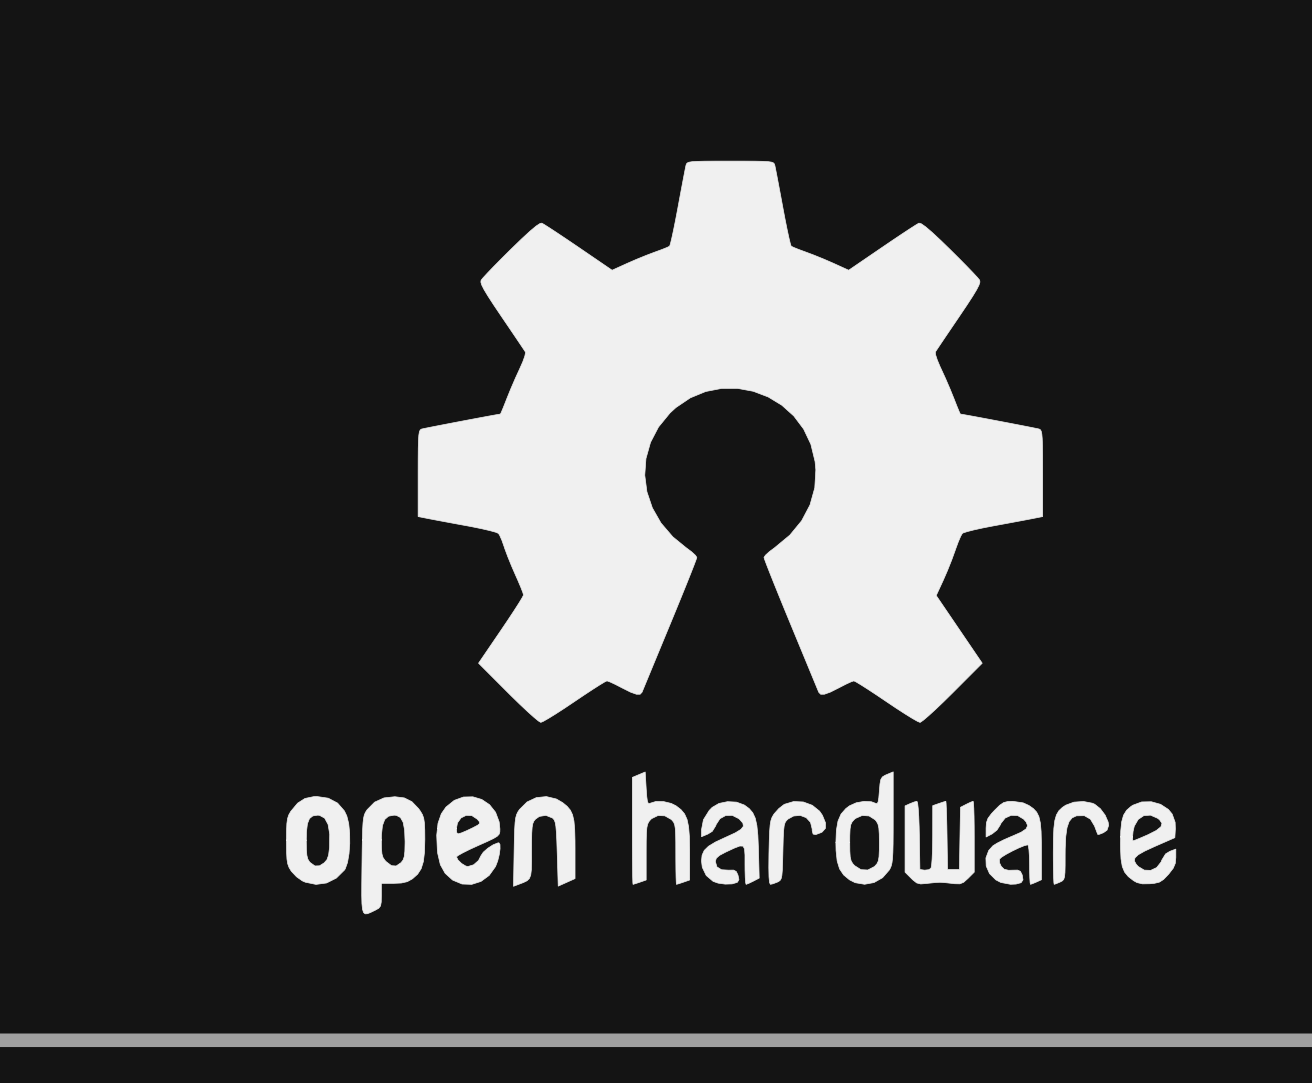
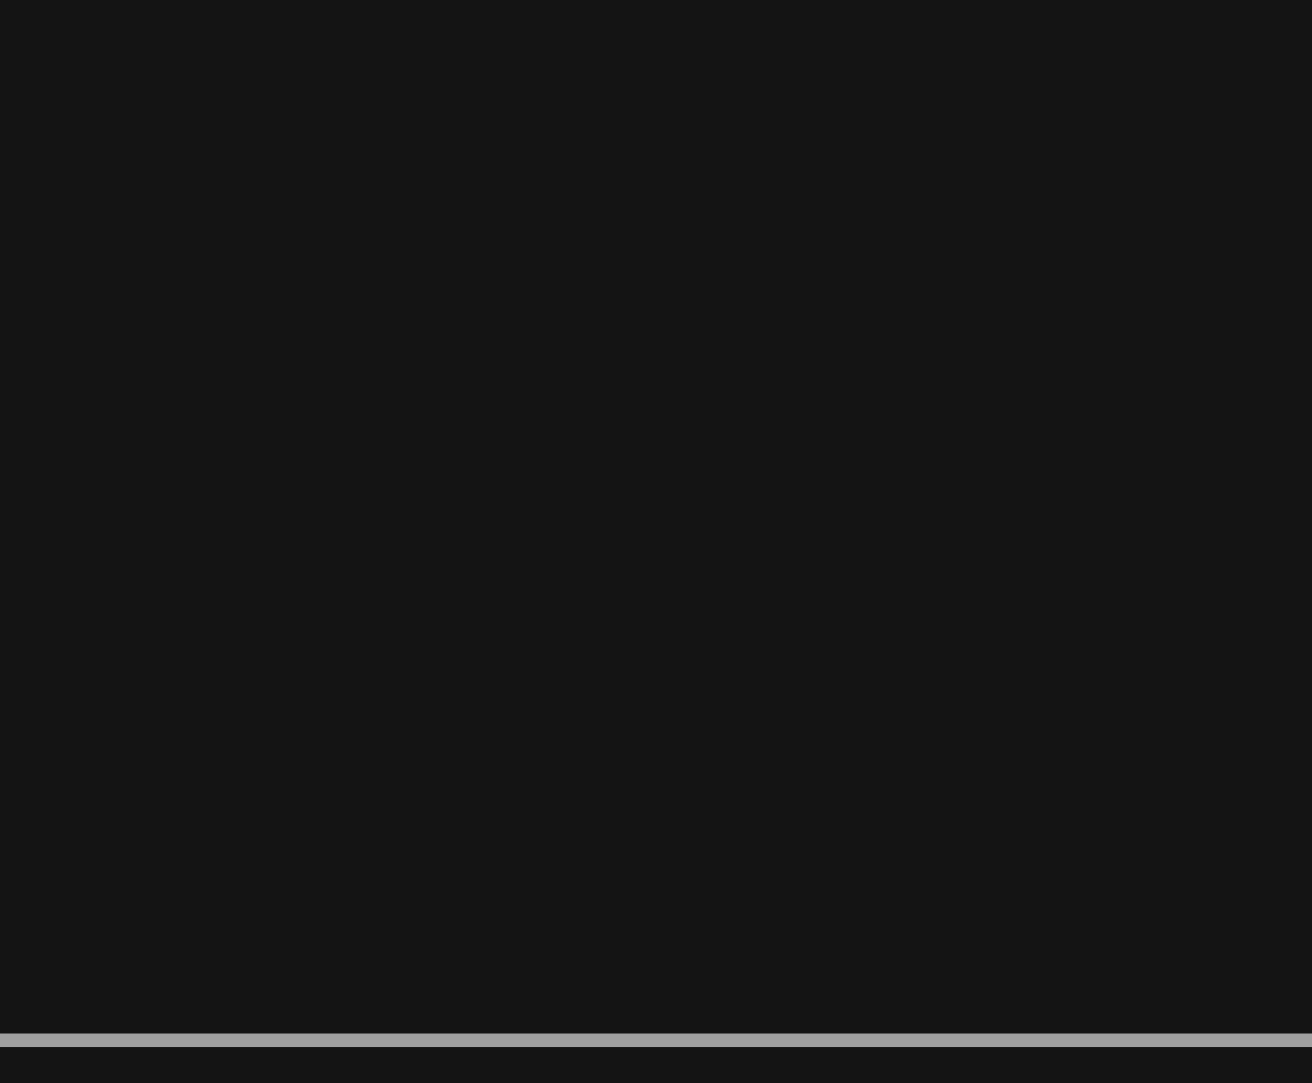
drawing: [286, 160, 1177, 915] -> none

